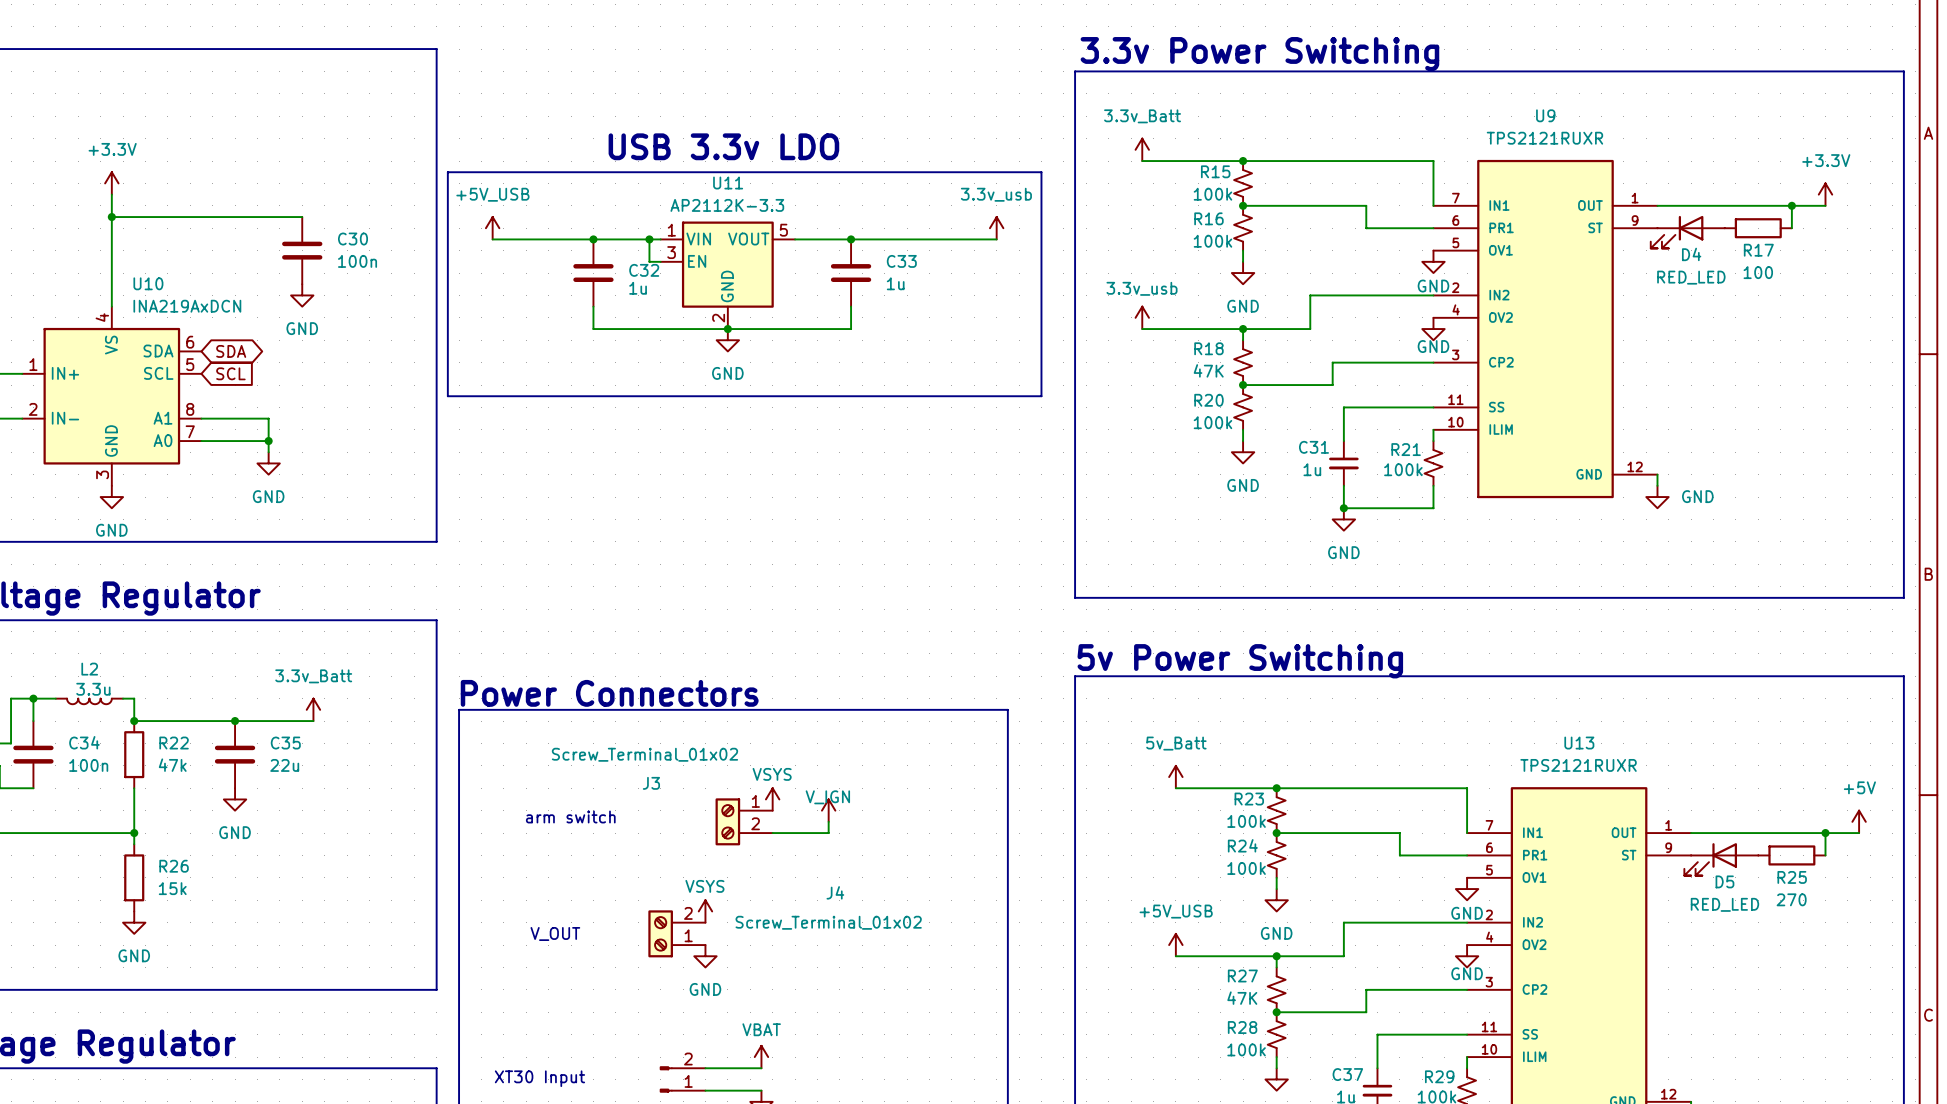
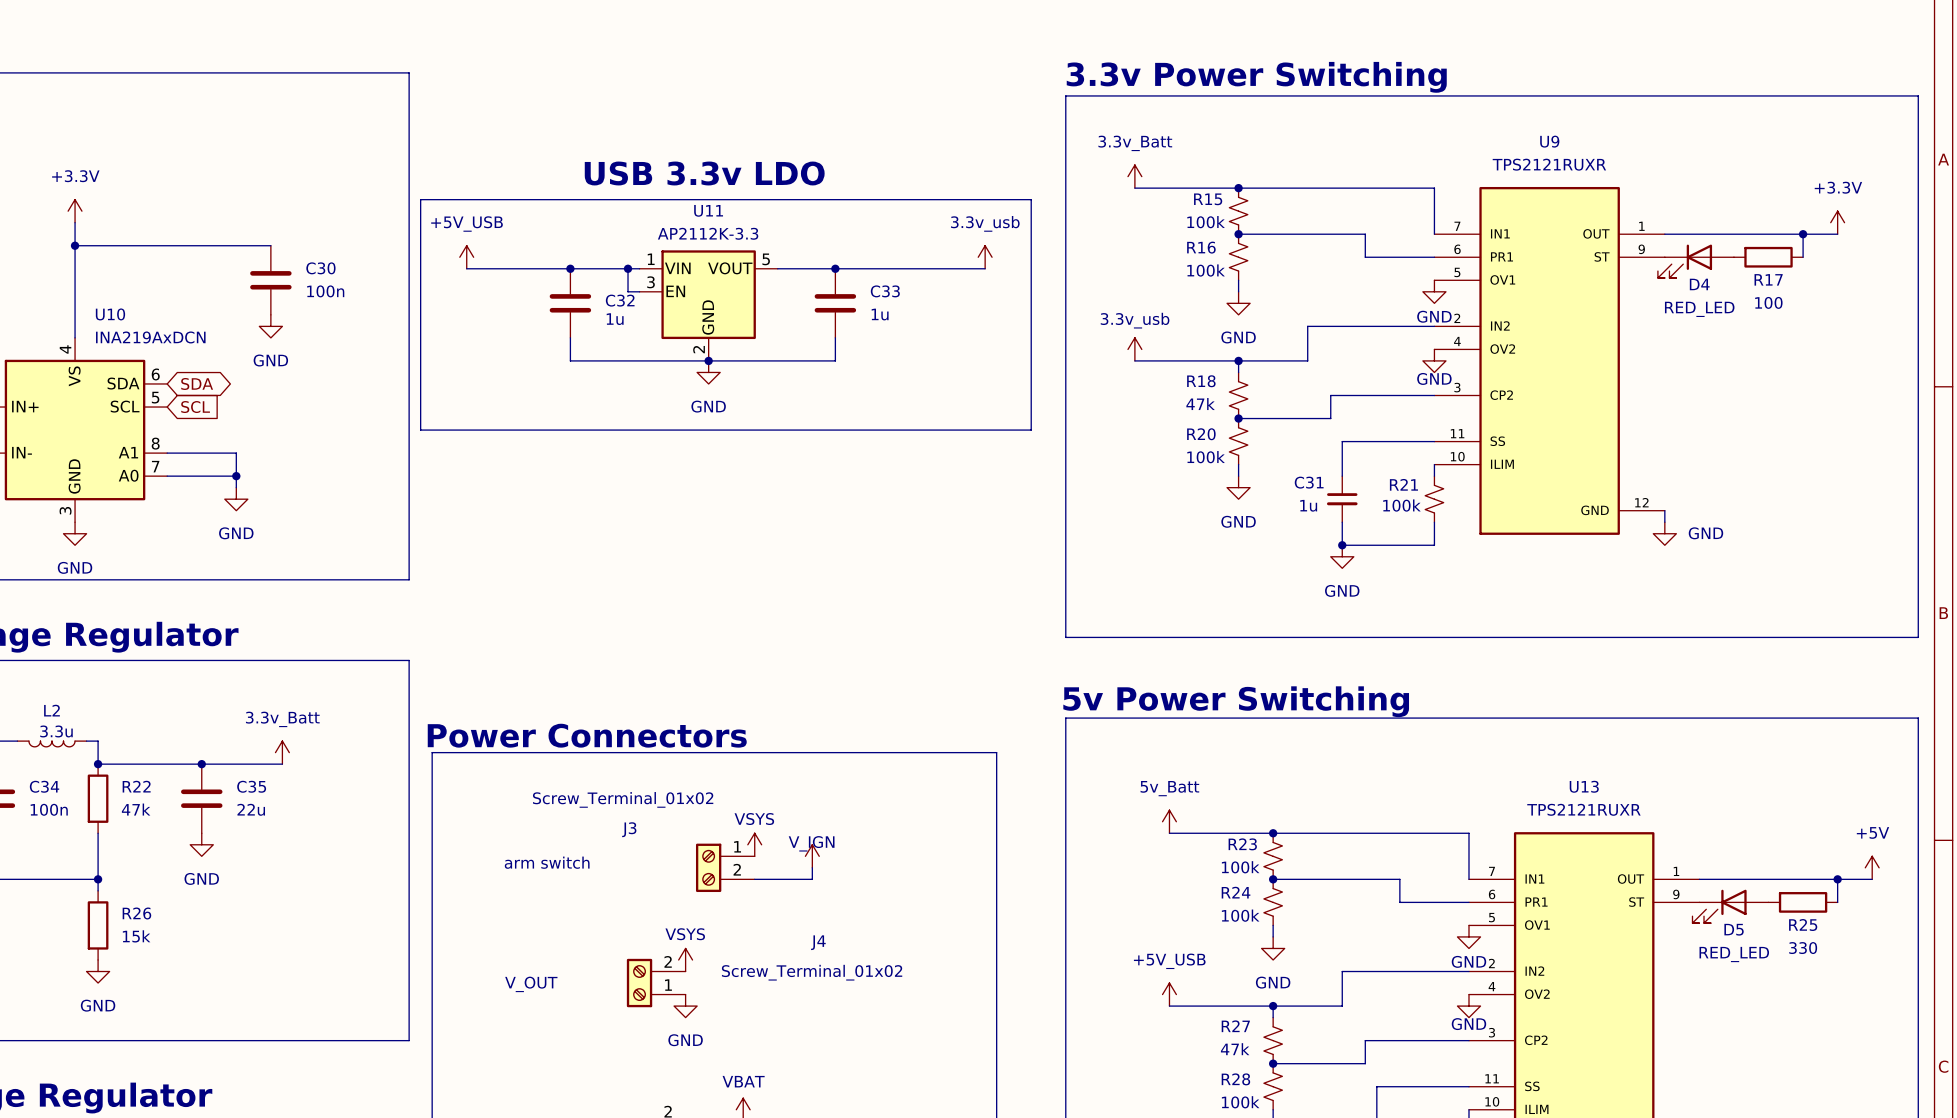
R18 value: 47K (1208, 370) -> 47k (1200, 404)
R25 value: 270 (1791, 899) -> 330 (1803, 948)
R27 value: 47K (1242, 998) -> 47k (1235, 1049)

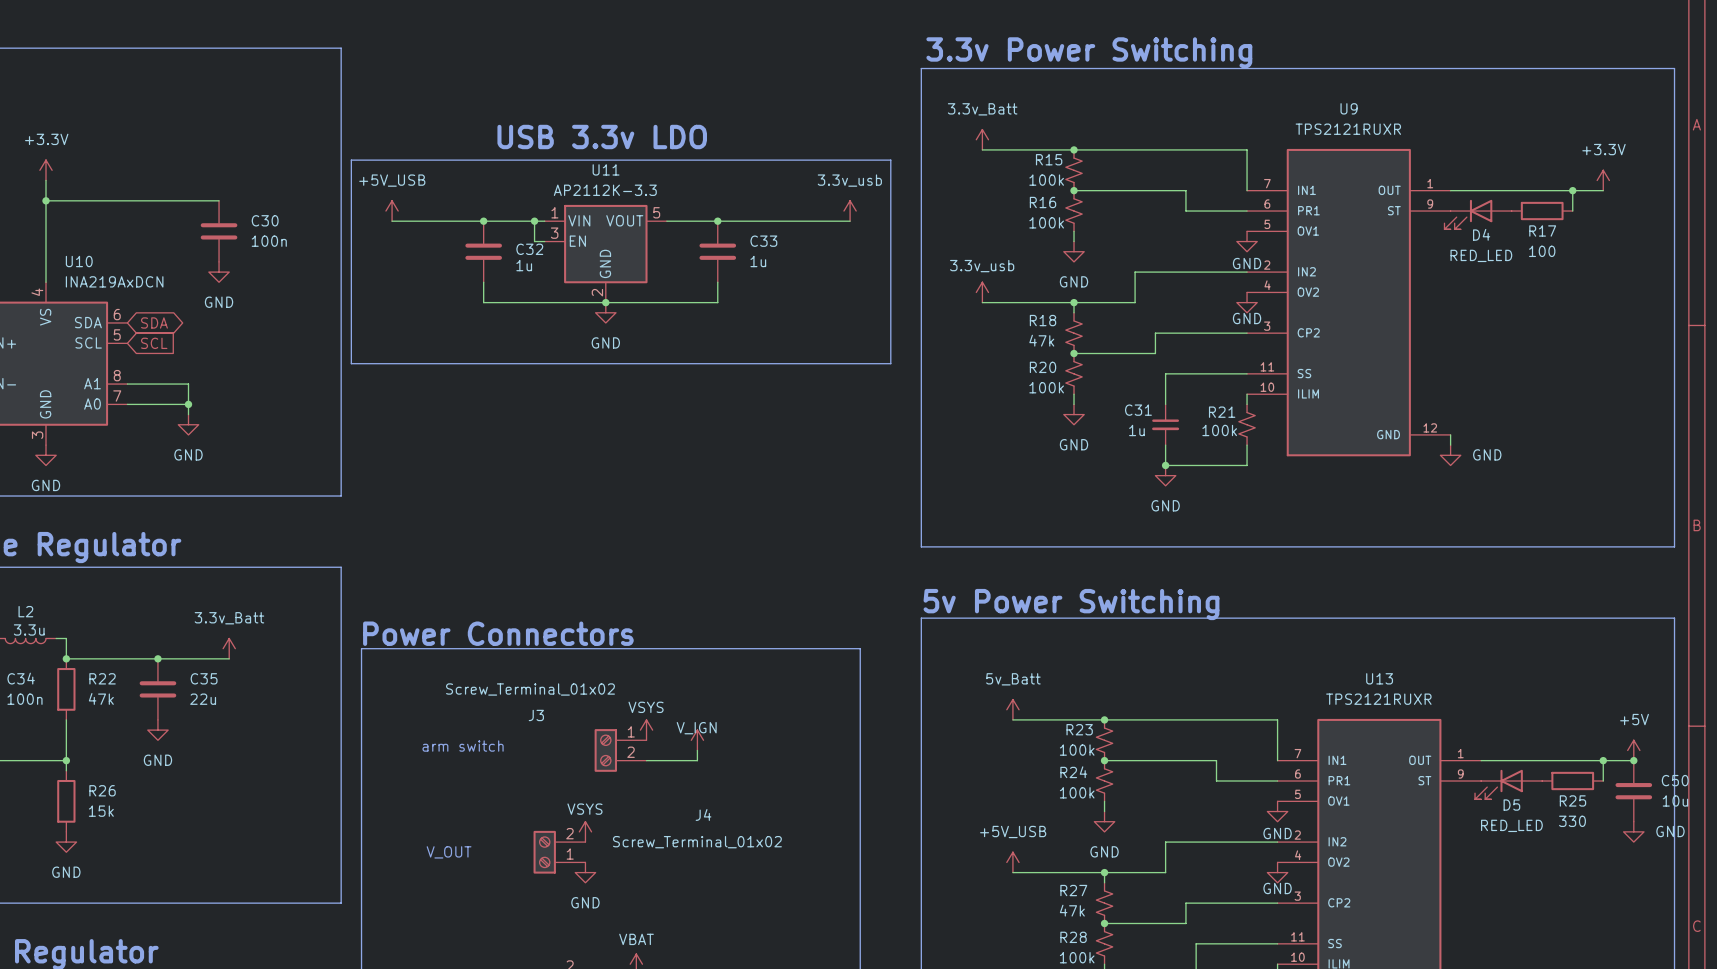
junction: none -> (1633, 760)
C50: none -> 10u (1633, 791)
power symbol: none -> GND (1633, 831)

